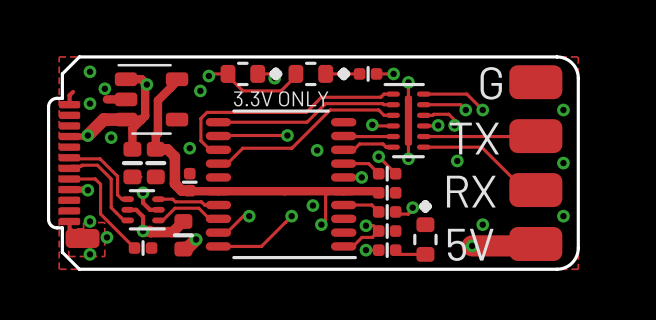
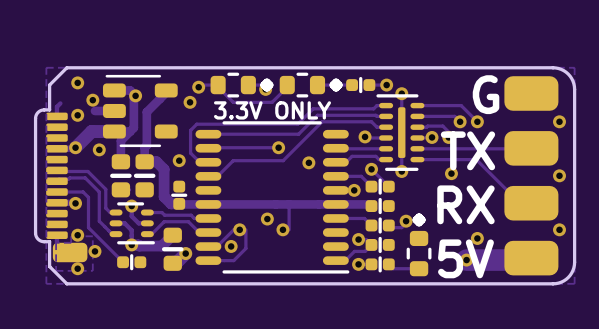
track: none -> (289, 204) (289, 229)
track: (325, 192) (325, 220) (321, 224) -> none
via: none -> (267, 219)
via: (312, 205) -> none
track: (291, 216) (261, 246) (243, 246) -> (245, 229) (245, 248) (233, 260)
via: (321, 224) -> none
via: none -> (231, 246)

